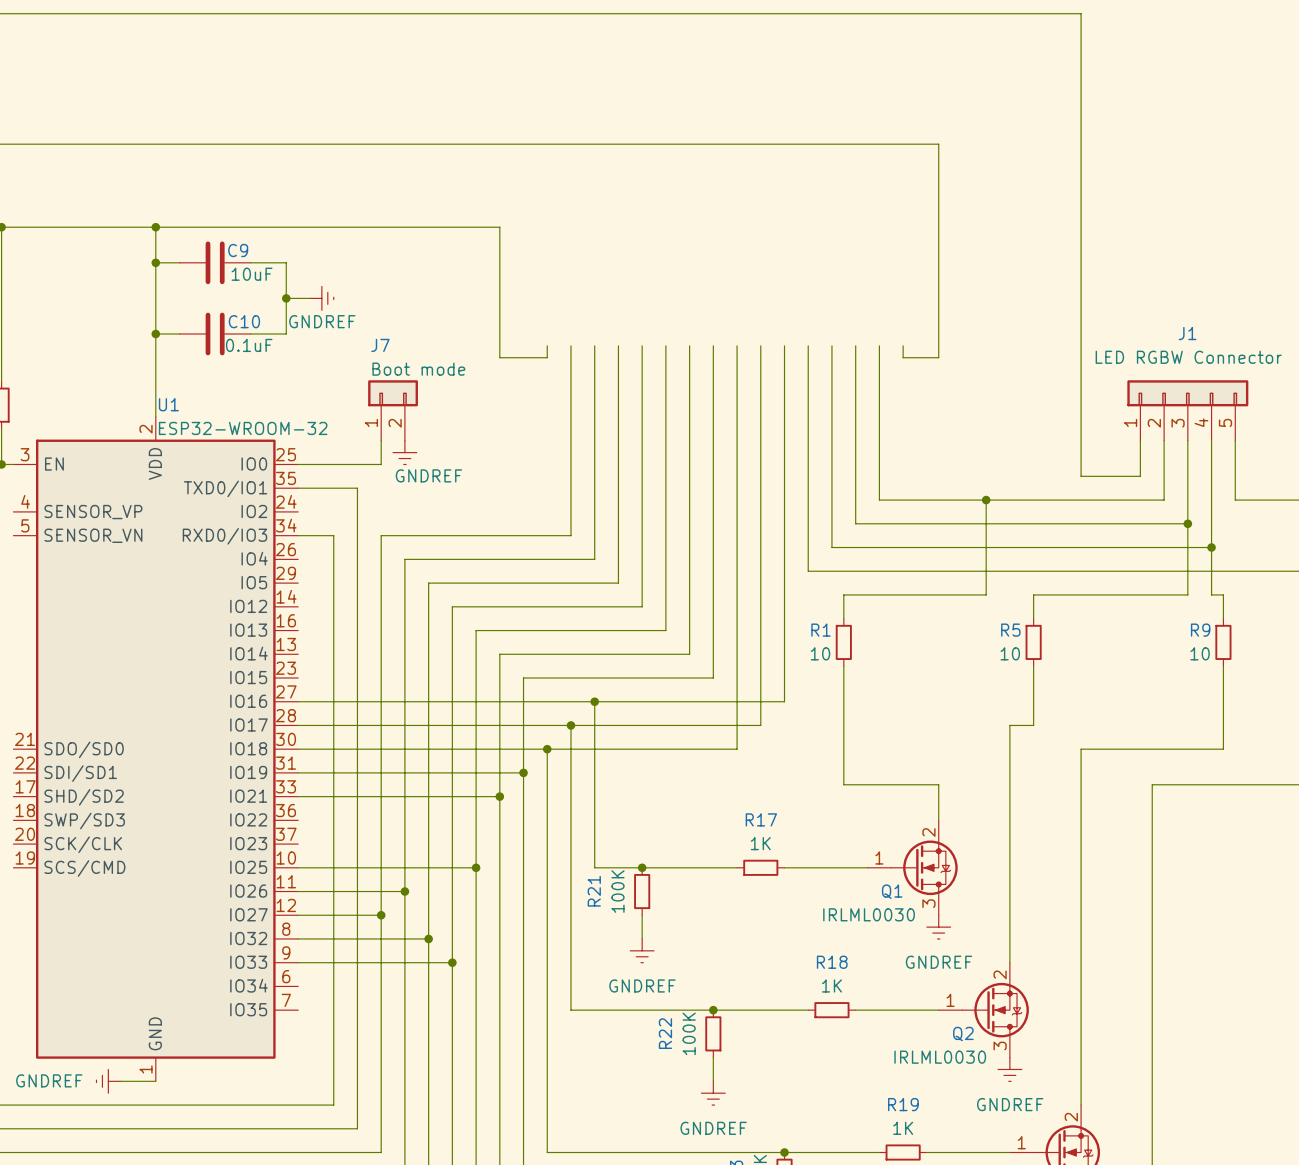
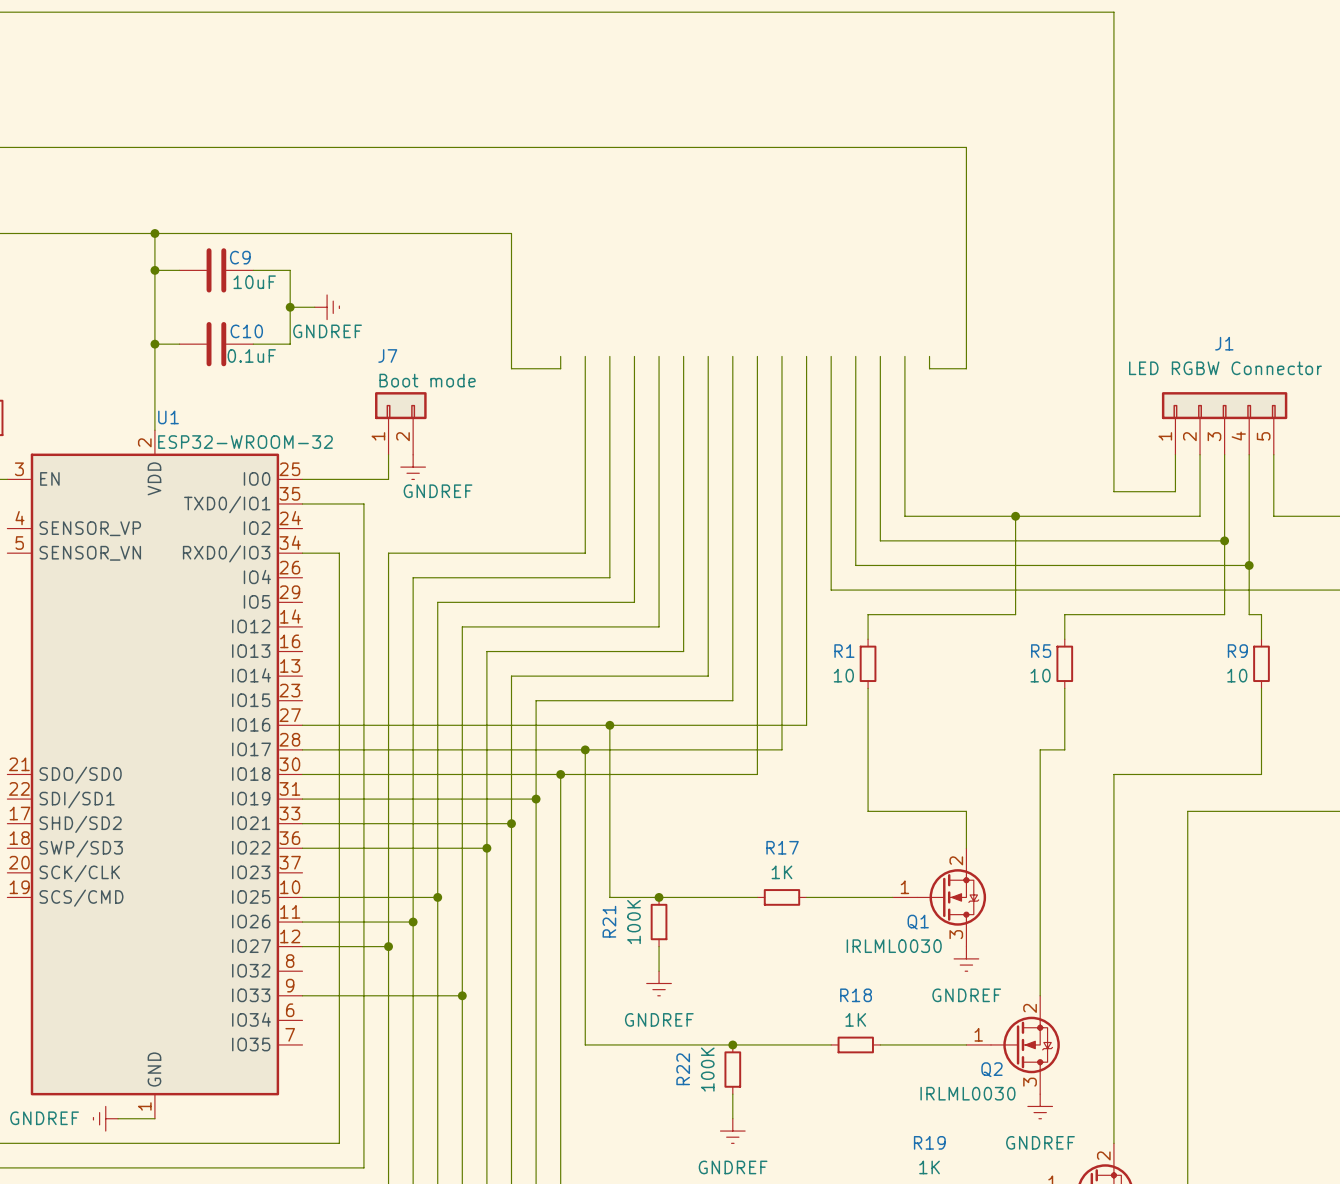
wire: none -> (302, 848) (486, 848)
junction: none -> (486, 848)
wire: (428, 867) (476, 867) -> none
junction: none -> (437, 897)
junction: (476, 867) -> none
wire: (298, 938) (428, 938) -> none
junction: (428, 938) -> none

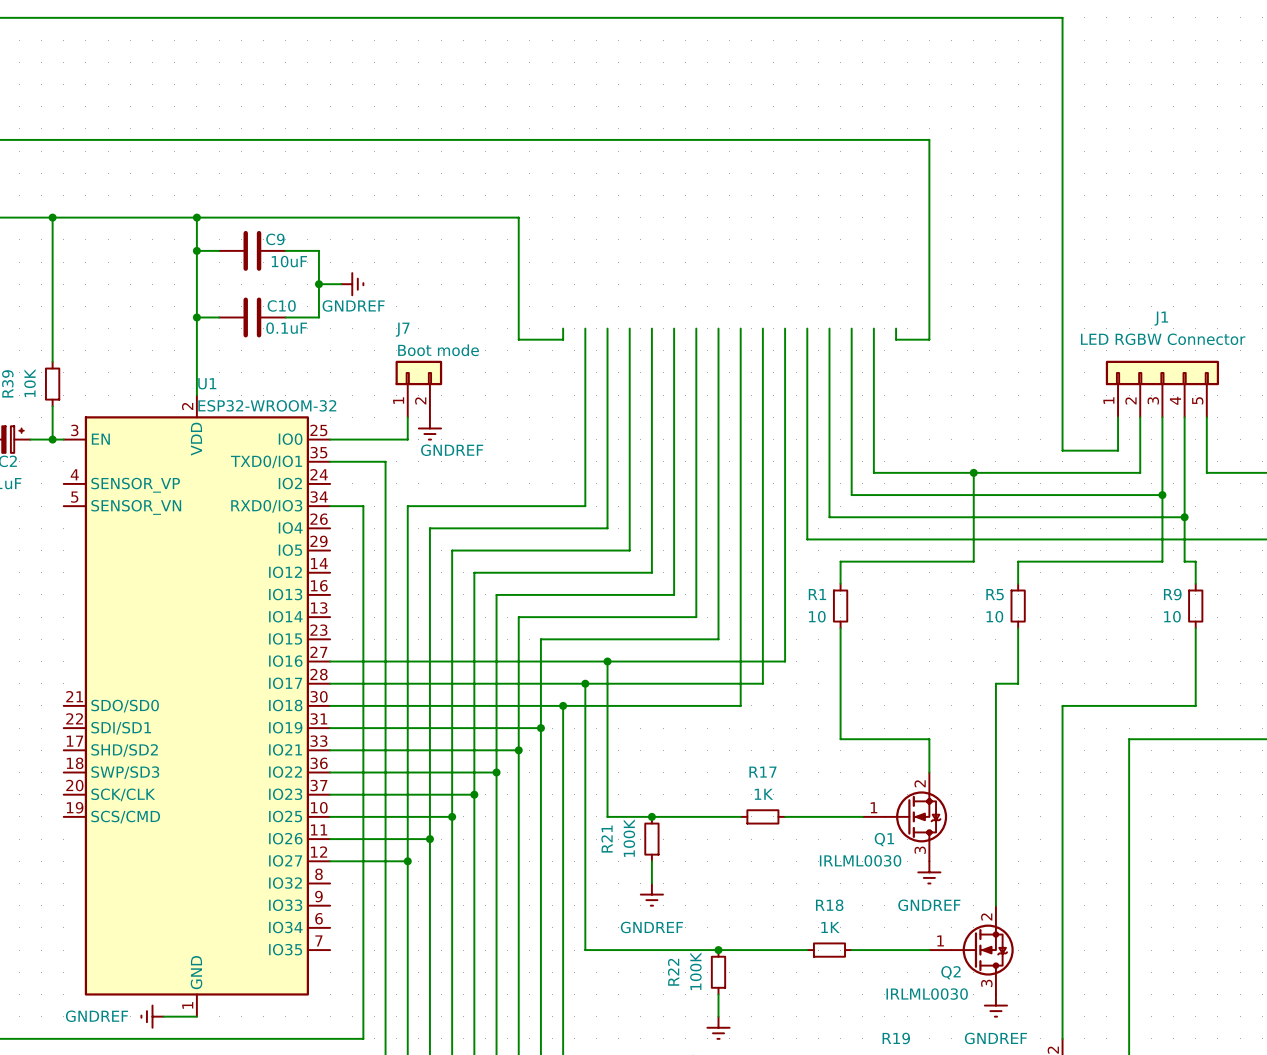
junction: none -> (474, 794)
wire: (302, 995) (462, 995) -> (330, 794) (474, 794)
junction: (462, 995) -> none

